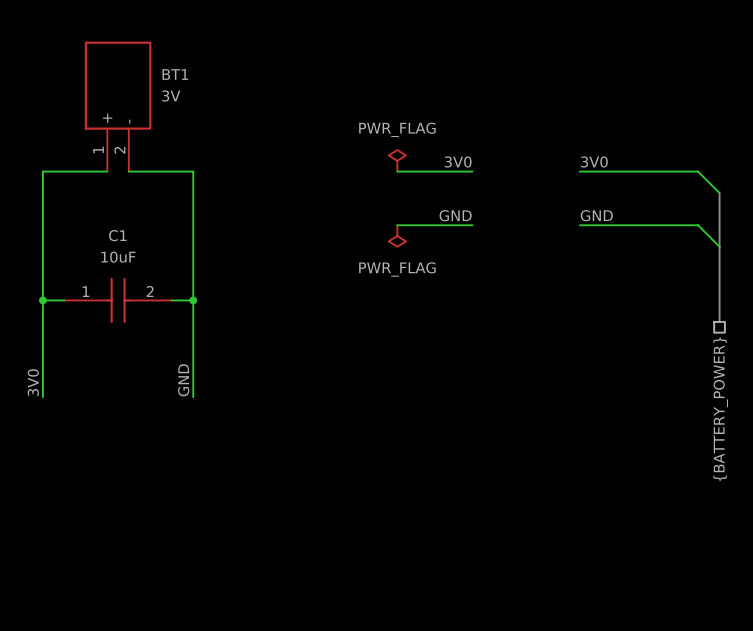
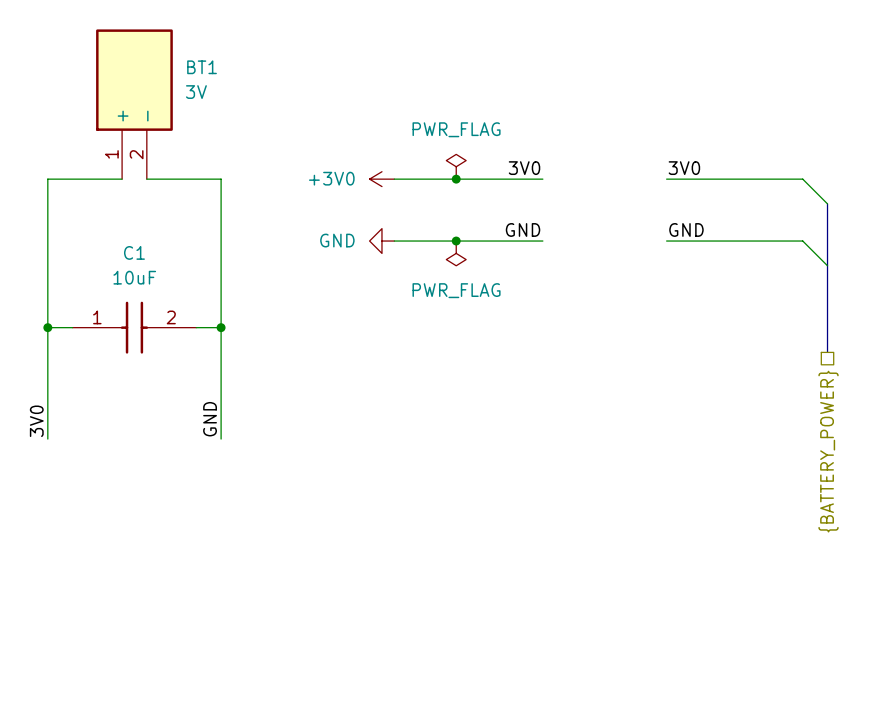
power symbol: none -> +3V0 (381, 179)
wire: none -> (394, 179) (456, 179)
junction: none -> (456, 179)
power symbol: none -> GND (381, 241)
wire: none -> (394, 241) (456, 241)
junction: none -> (456, 241)

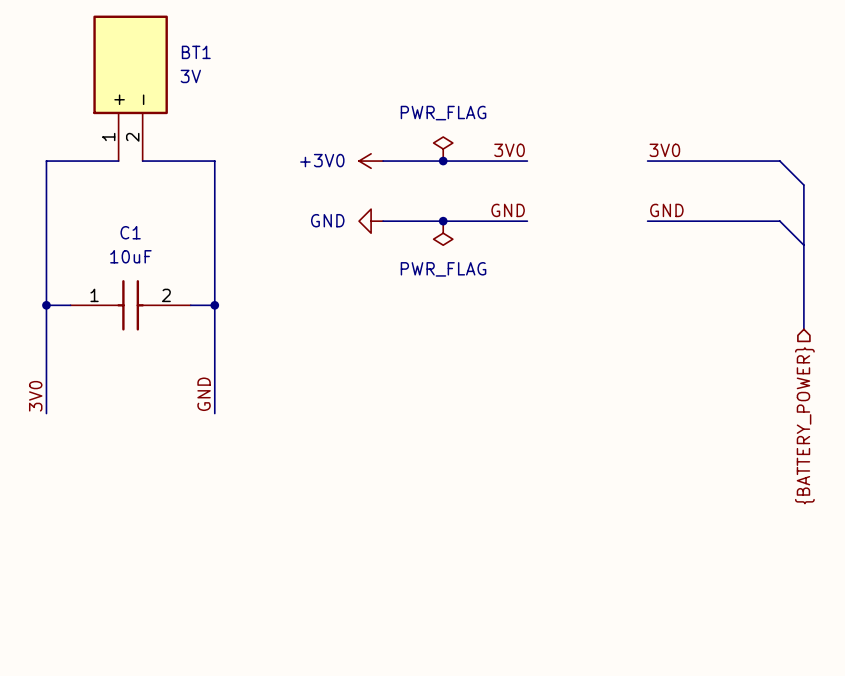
hierarchical label shape: passive (828, 451) -> input (804, 425)

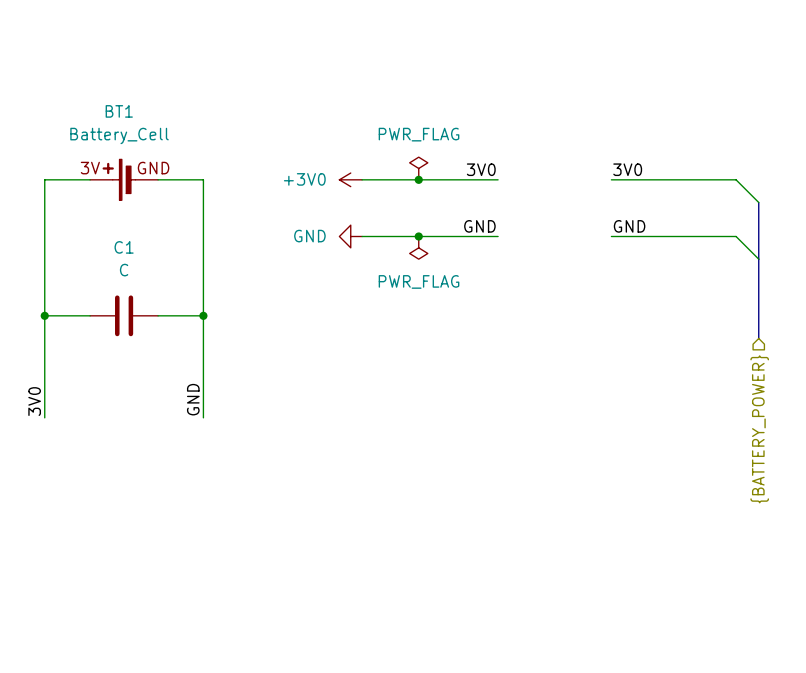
BT1 symbol: [93, 15, 168, 162] -> [90, 159, 159, 201]
BT1 name position: BT1 (196, 52) -> BT1 (119, 111)
BT1 value: 3V (190, 76) -> Battery_Cell (119, 135)
C1 value: 10uF (130, 256) -> C (124, 270)
C1 symbol: [70, 280, 191, 331] -> [90, 295, 159, 337]

